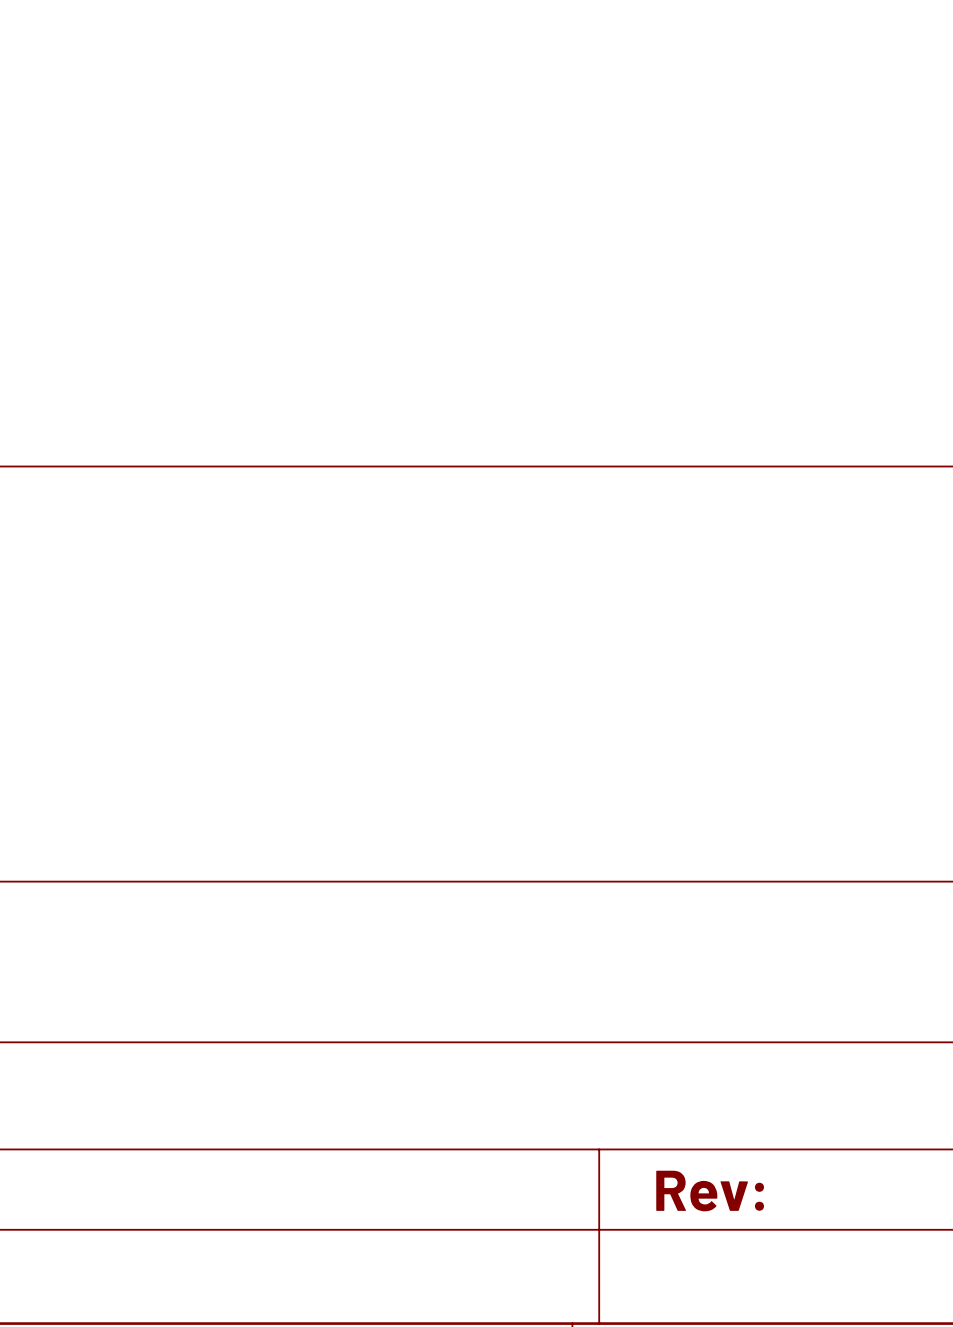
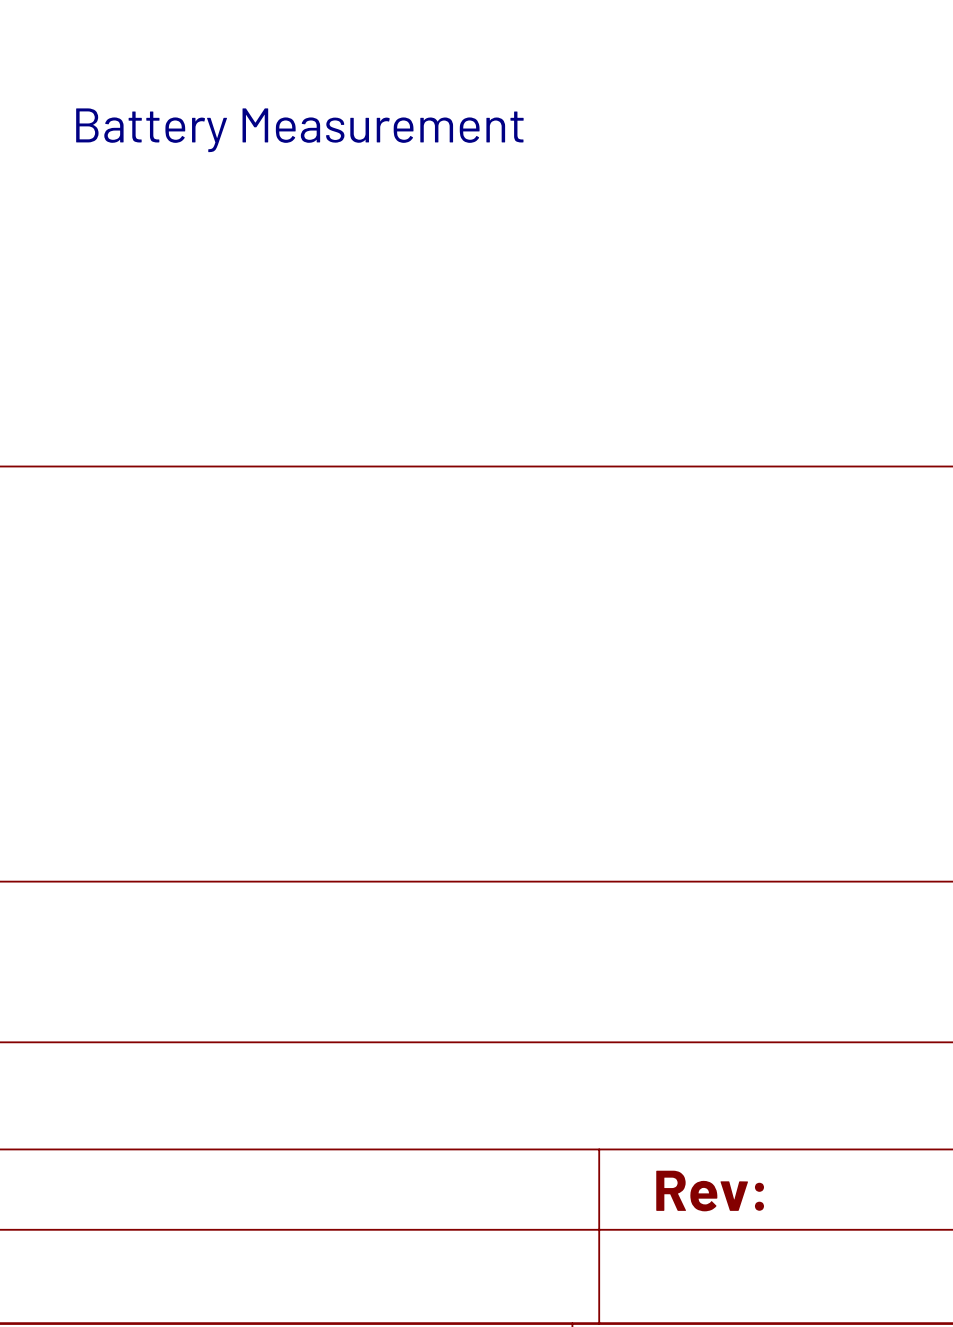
text: none -> Battery Measurement (299, 130)

